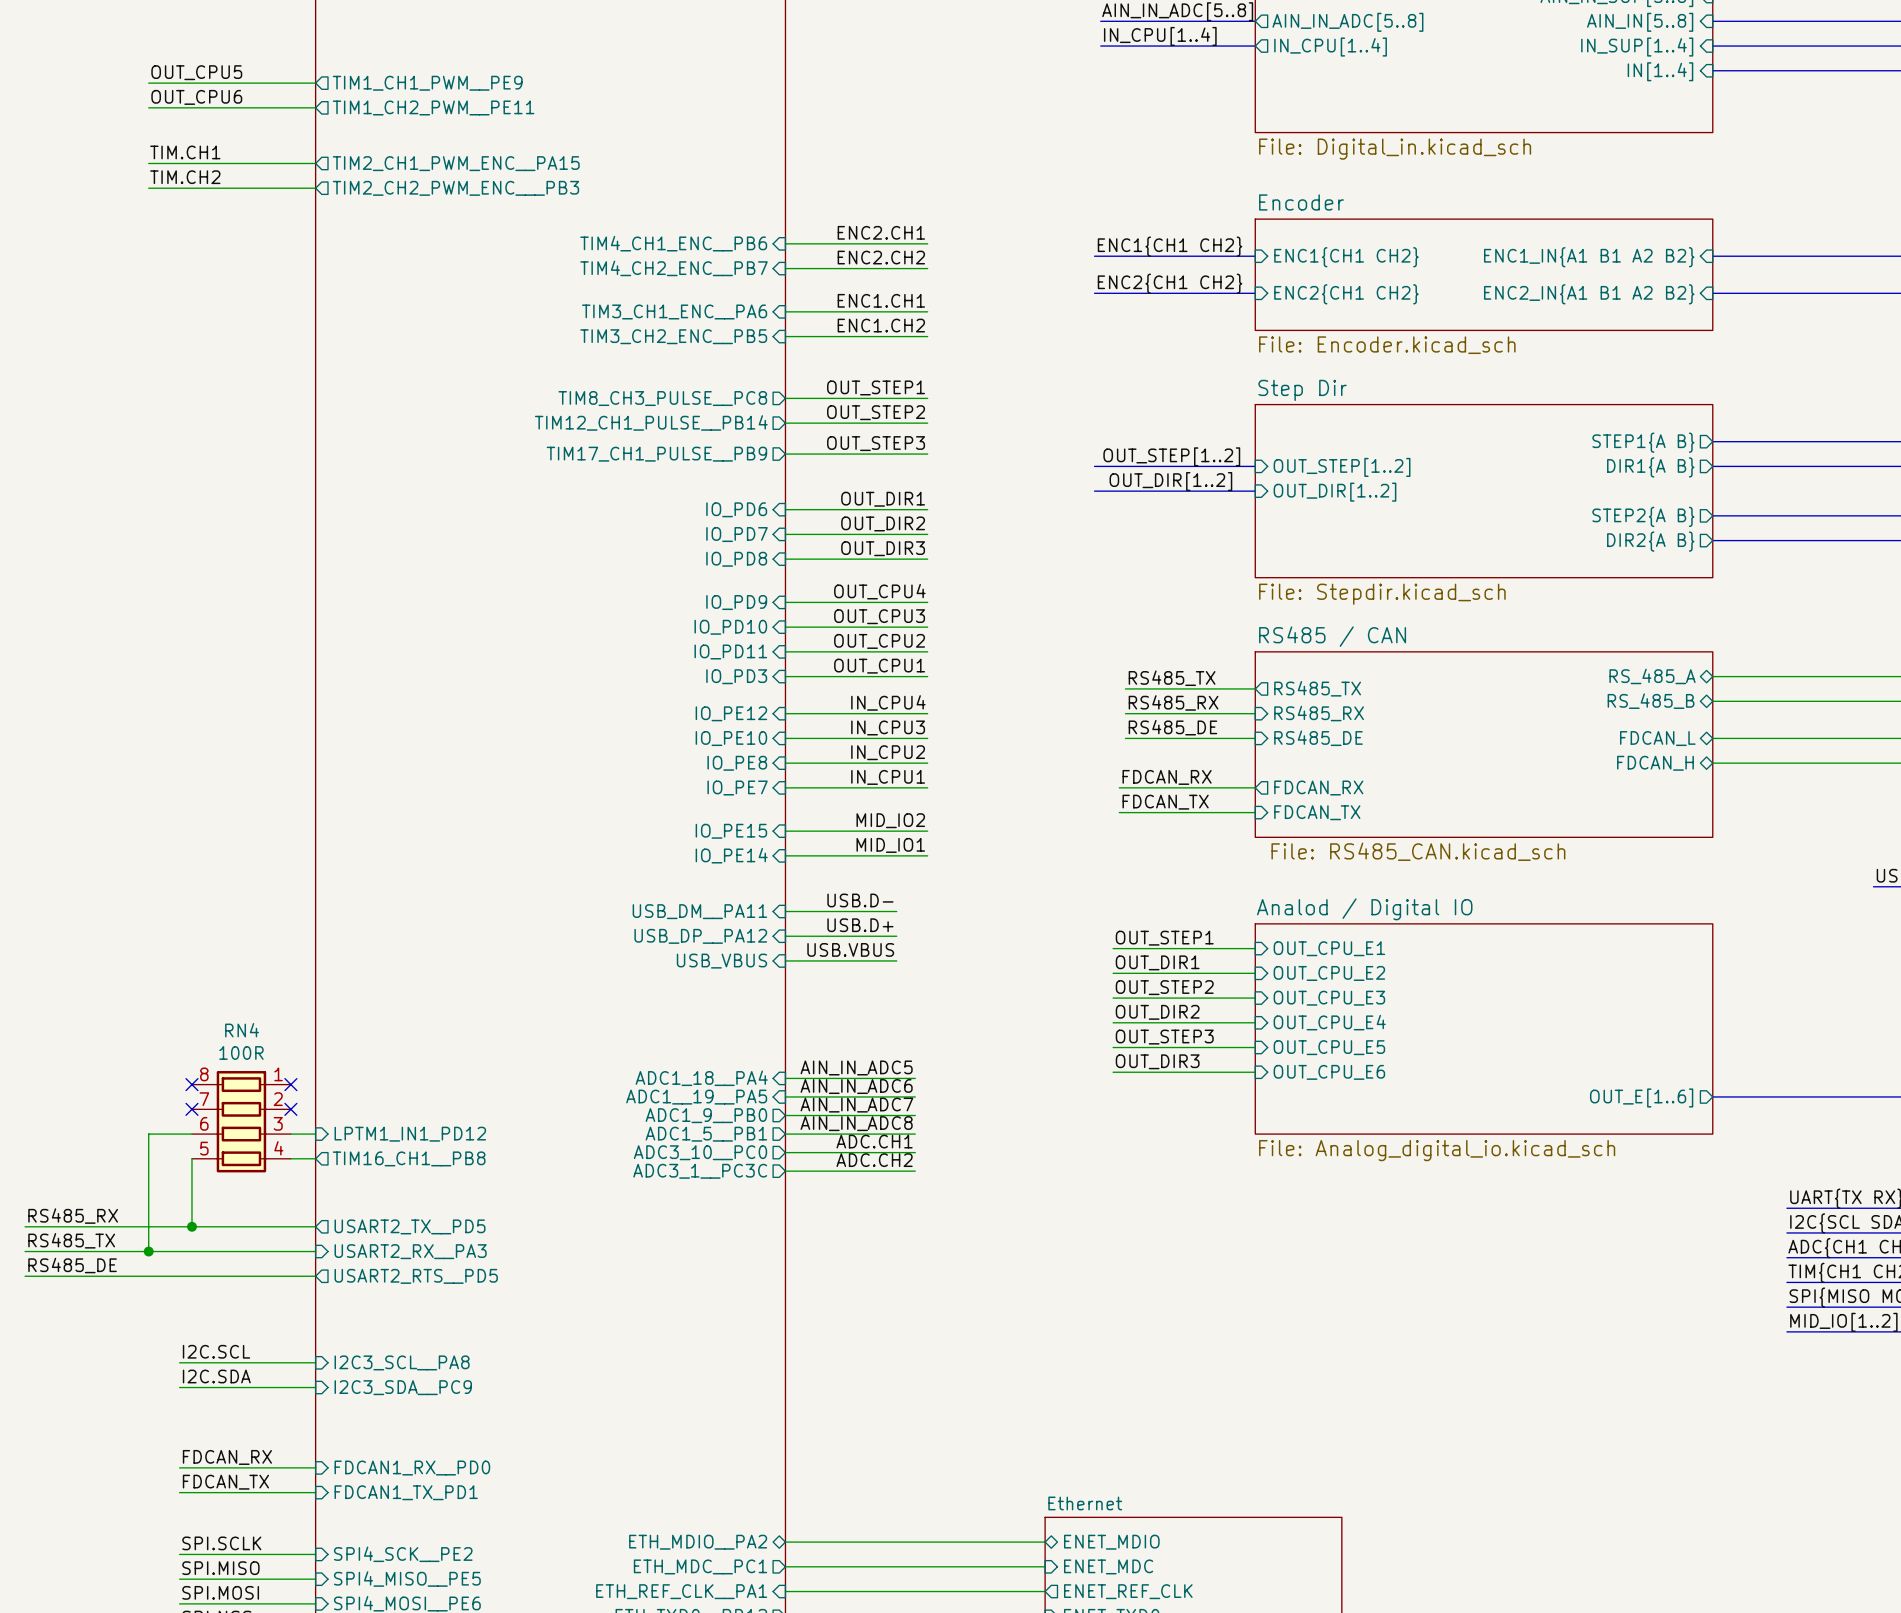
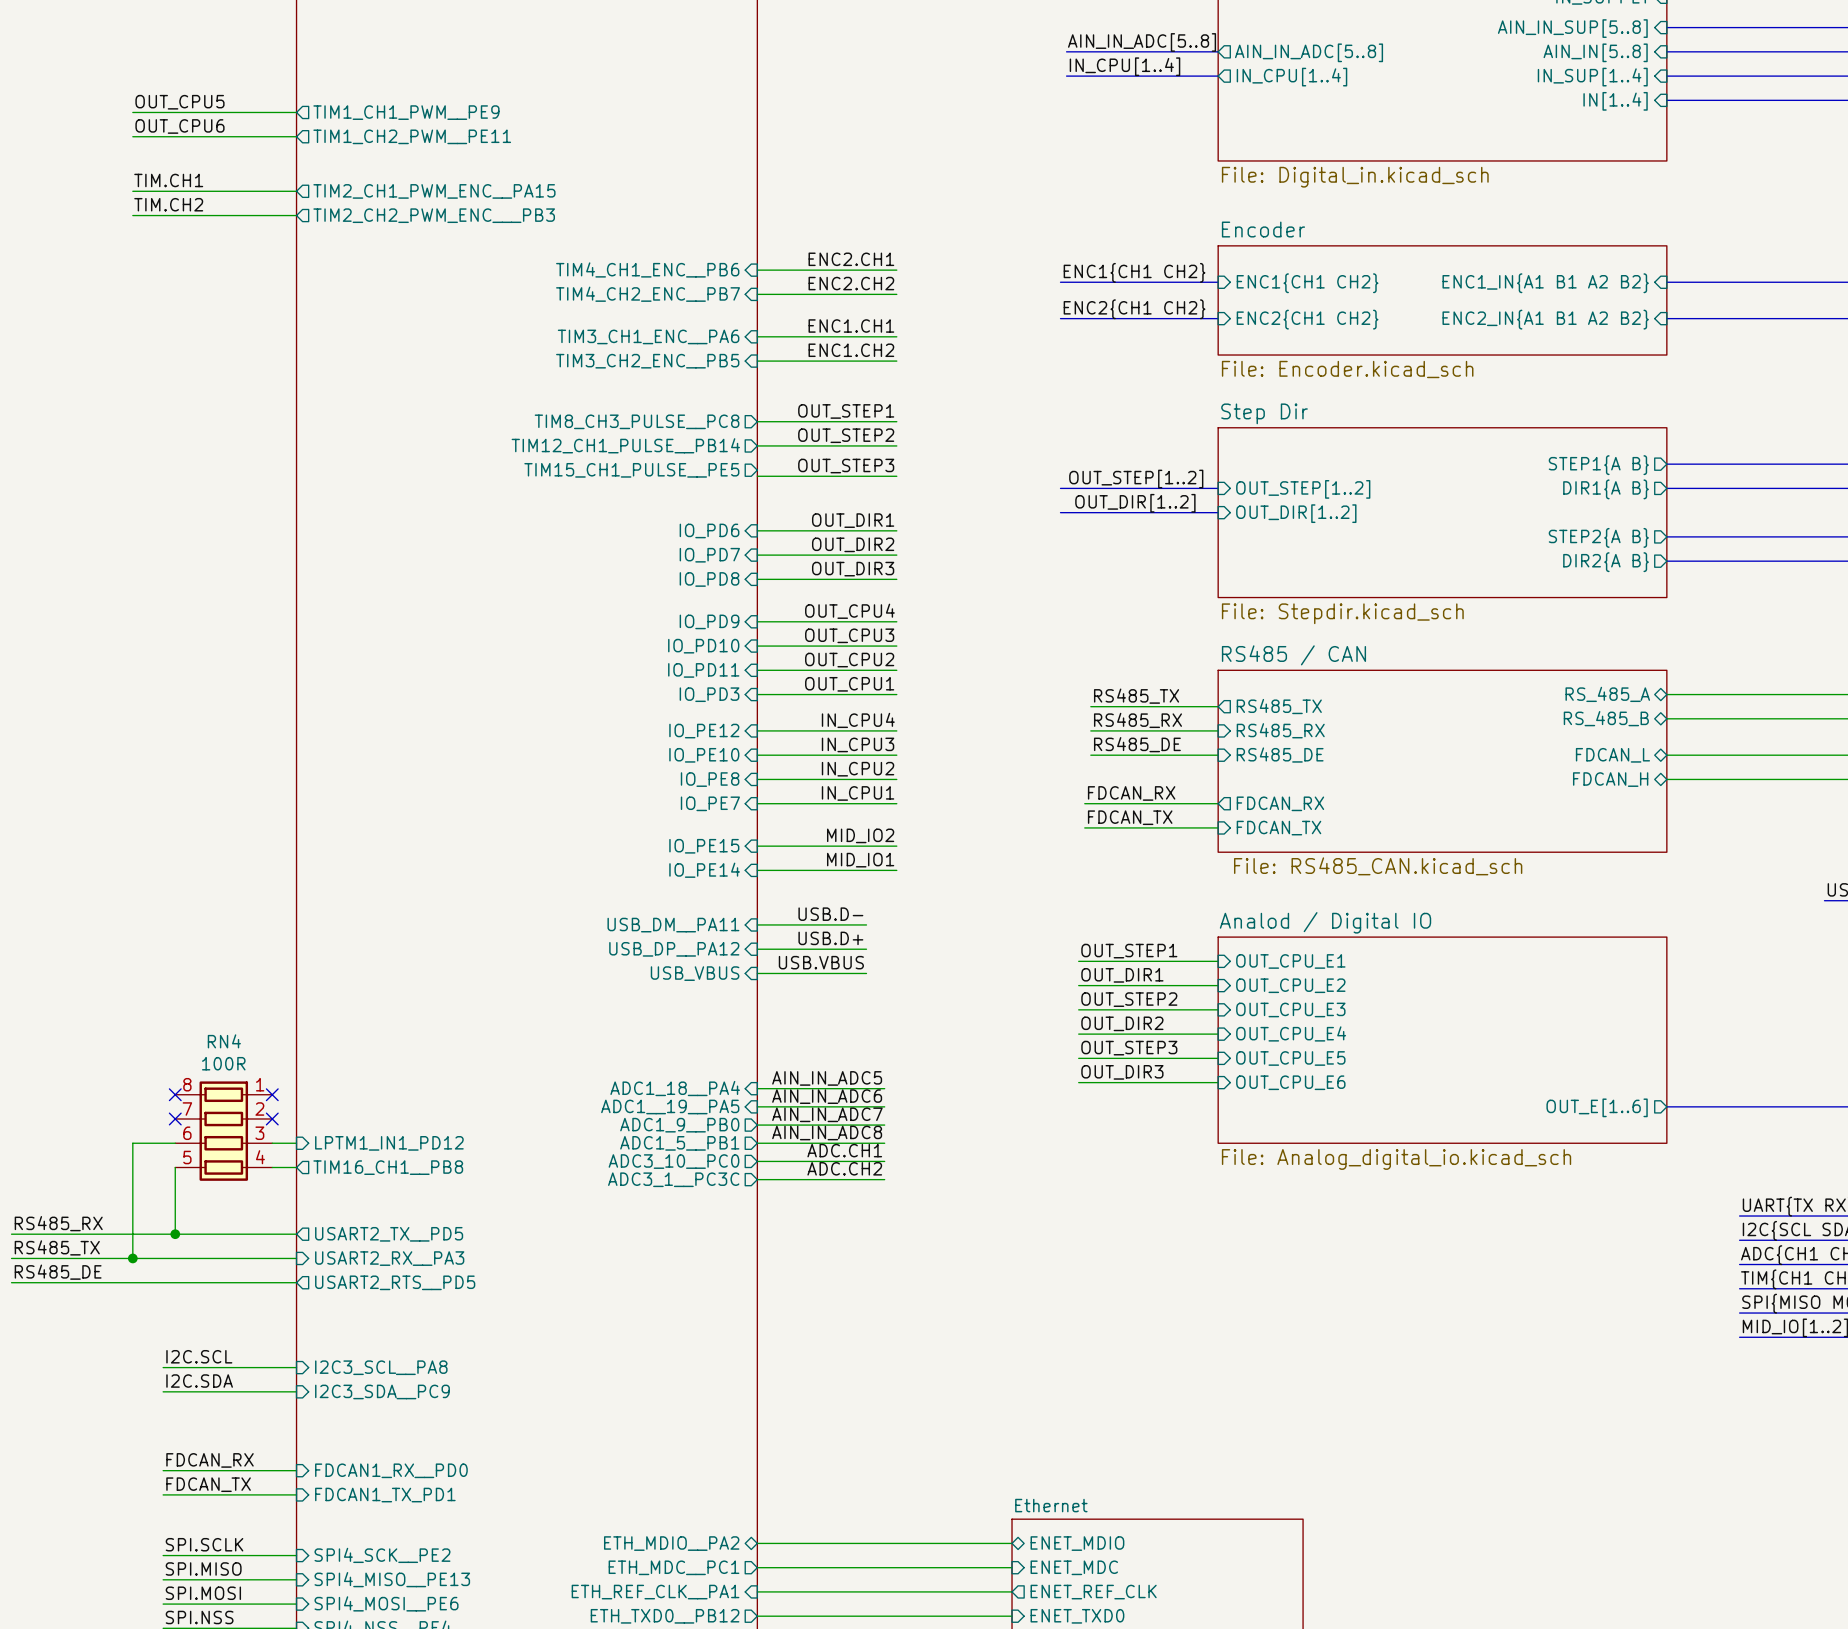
sheet pin: TIM17_CH1_PULSE__PB9 (656, 454) -> TIM15_CH1_PULSE__PE5 (631, 470)
sheet pin: SPI4_MISO__PE5 (407, 1579) -> SPI4_MISO__PE13 (392, 1579)

